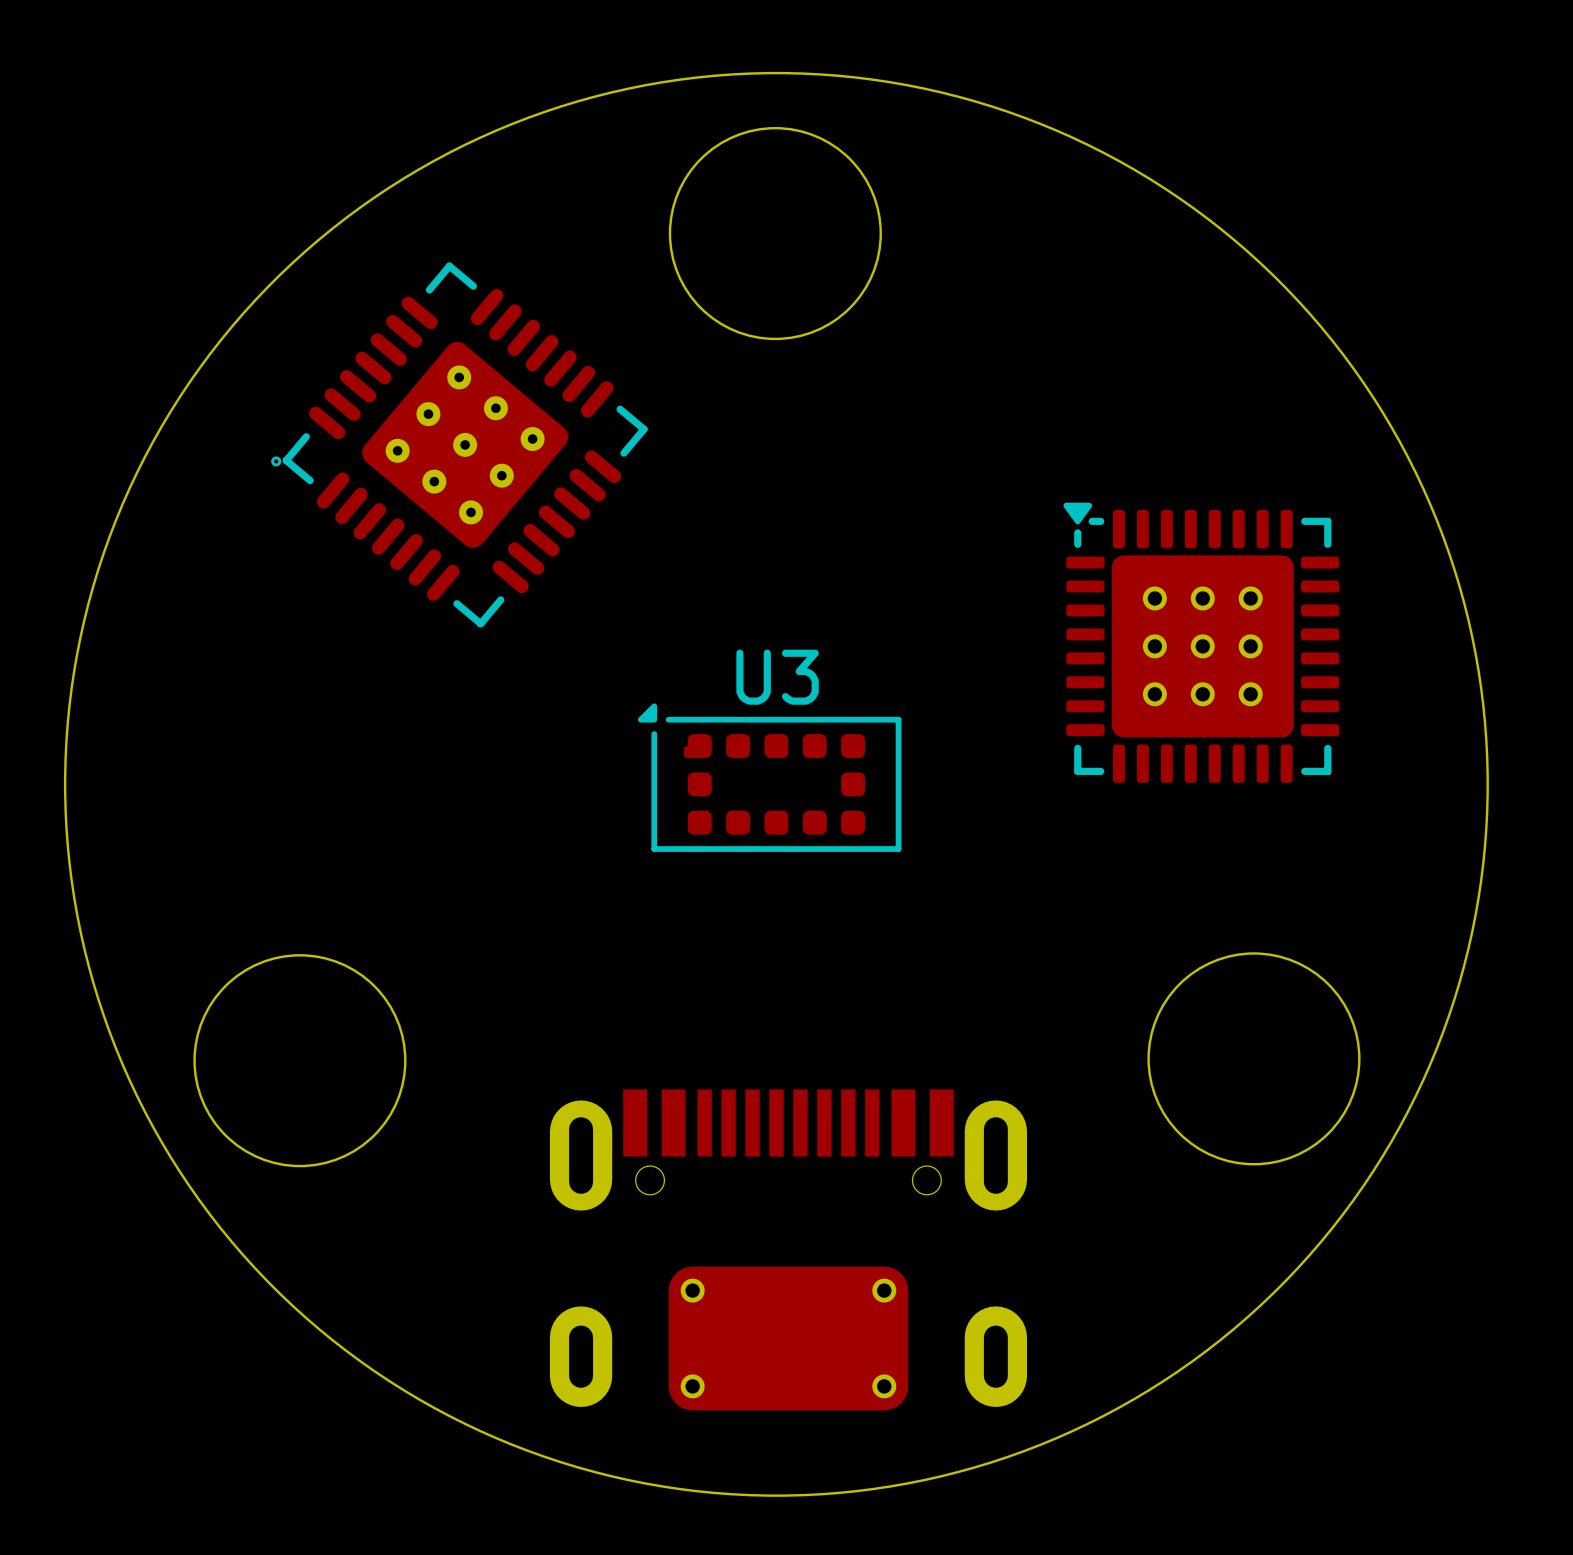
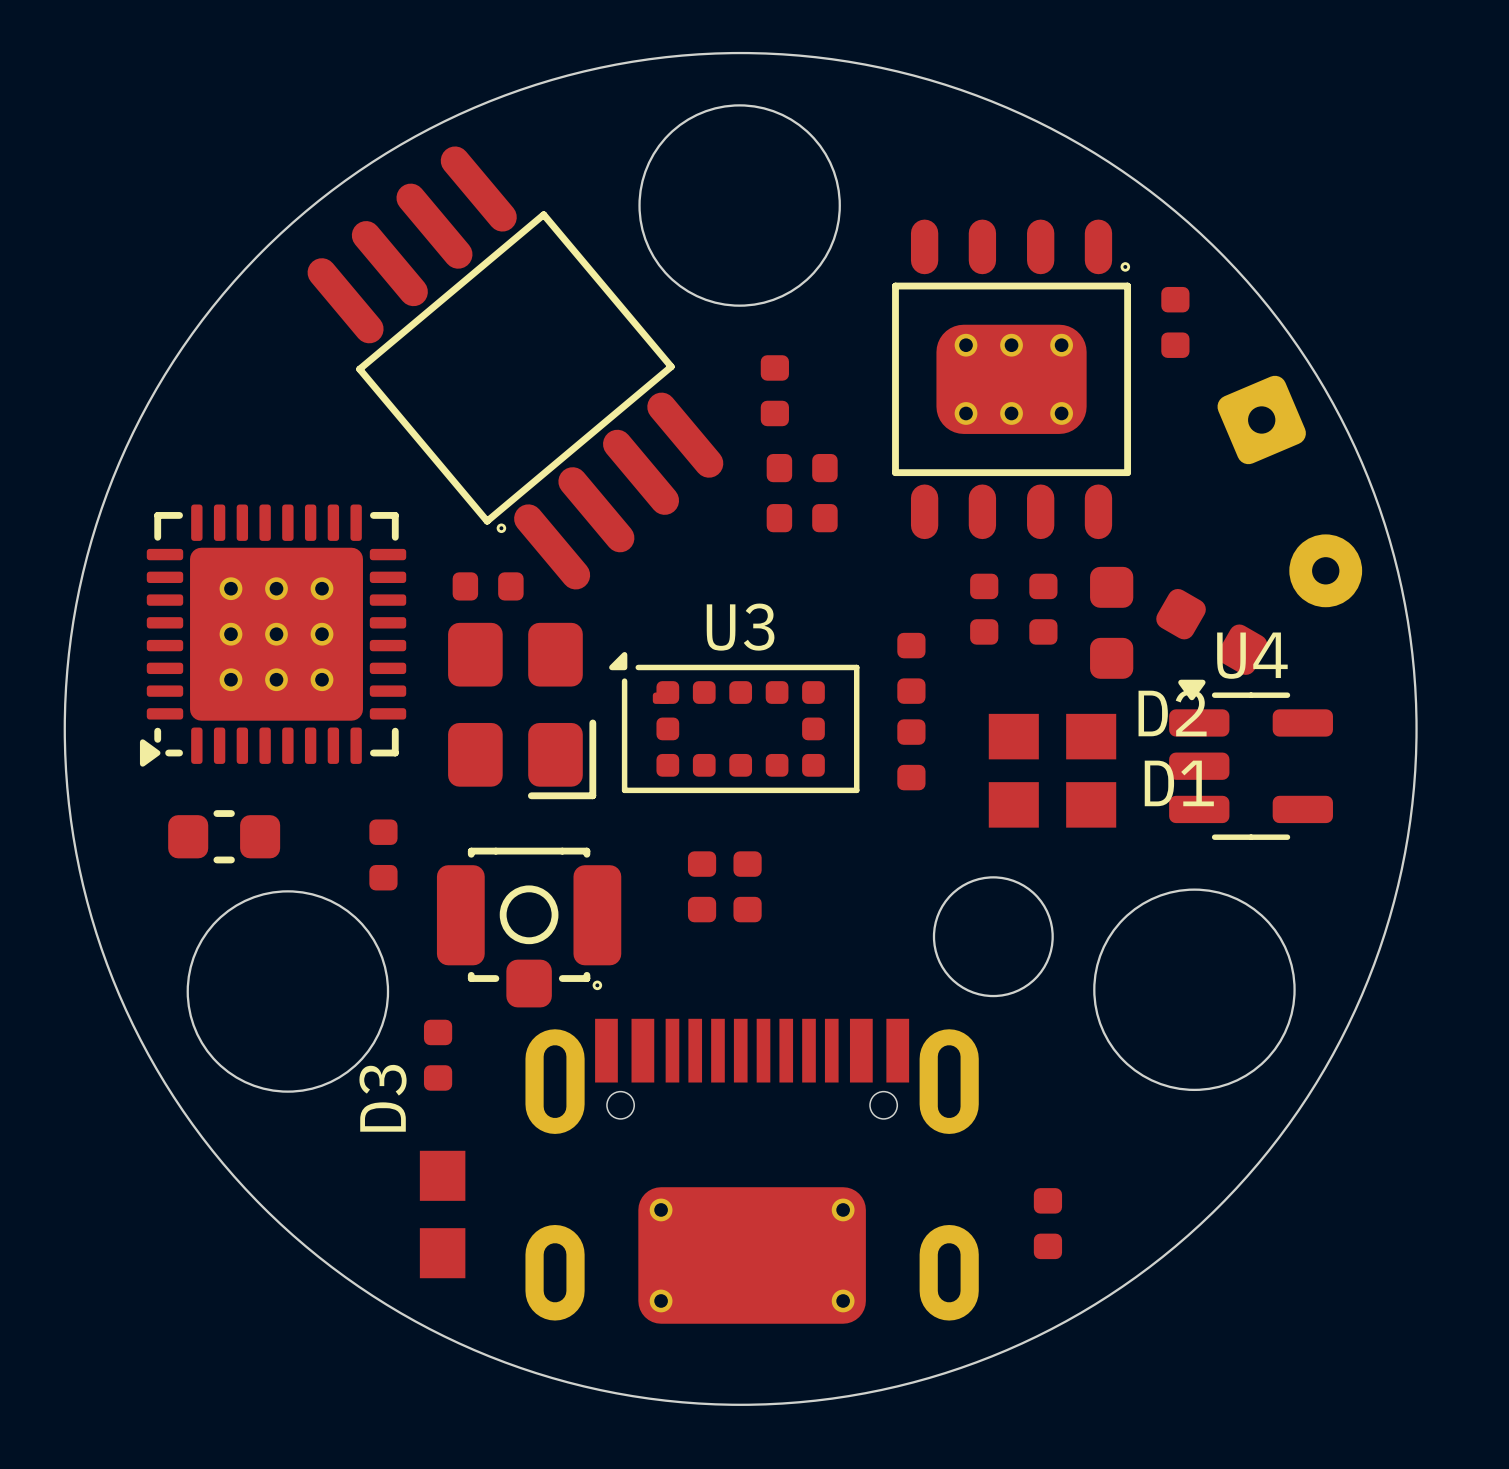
part: none -> (1175, 322)
part: none -> (515, 367)
part: none -> (1011, 379)
part: none -> (774, 390)
part: (459, 444) -> none
part: none -> (802, 468)
part: none -> (1289, 491)
part: none -> (802, 518)
part: none -> (488, 586)
part rotation: 0° (1201, 642) -> 90° counterclockwise (273, 635)
part position: (1201, 642) -> (273, 635)
part: none -> (984, 609)
part: none -> (1043, 609)
part: none -> (1111, 622)
part: none -> (1211, 631)
part: none -> (911, 668)
part: none -> (522, 711)
D2: none -> (1052, 736)
part: none -> (911, 754)
U4: none -> (1251, 759)
D1: none -> (1052, 804)
part: none -> (224, 836)
part: none -> (383, 854)
round board edge: none -> [932, 876, 1054, 998]
part: none -> (702, 886)
part: none -> (747, 886)
part: none -> (529, 927)
part: none -> (438, 1055)
D3: none -> (442, 1214)
part: none -> (1047, 1223)

